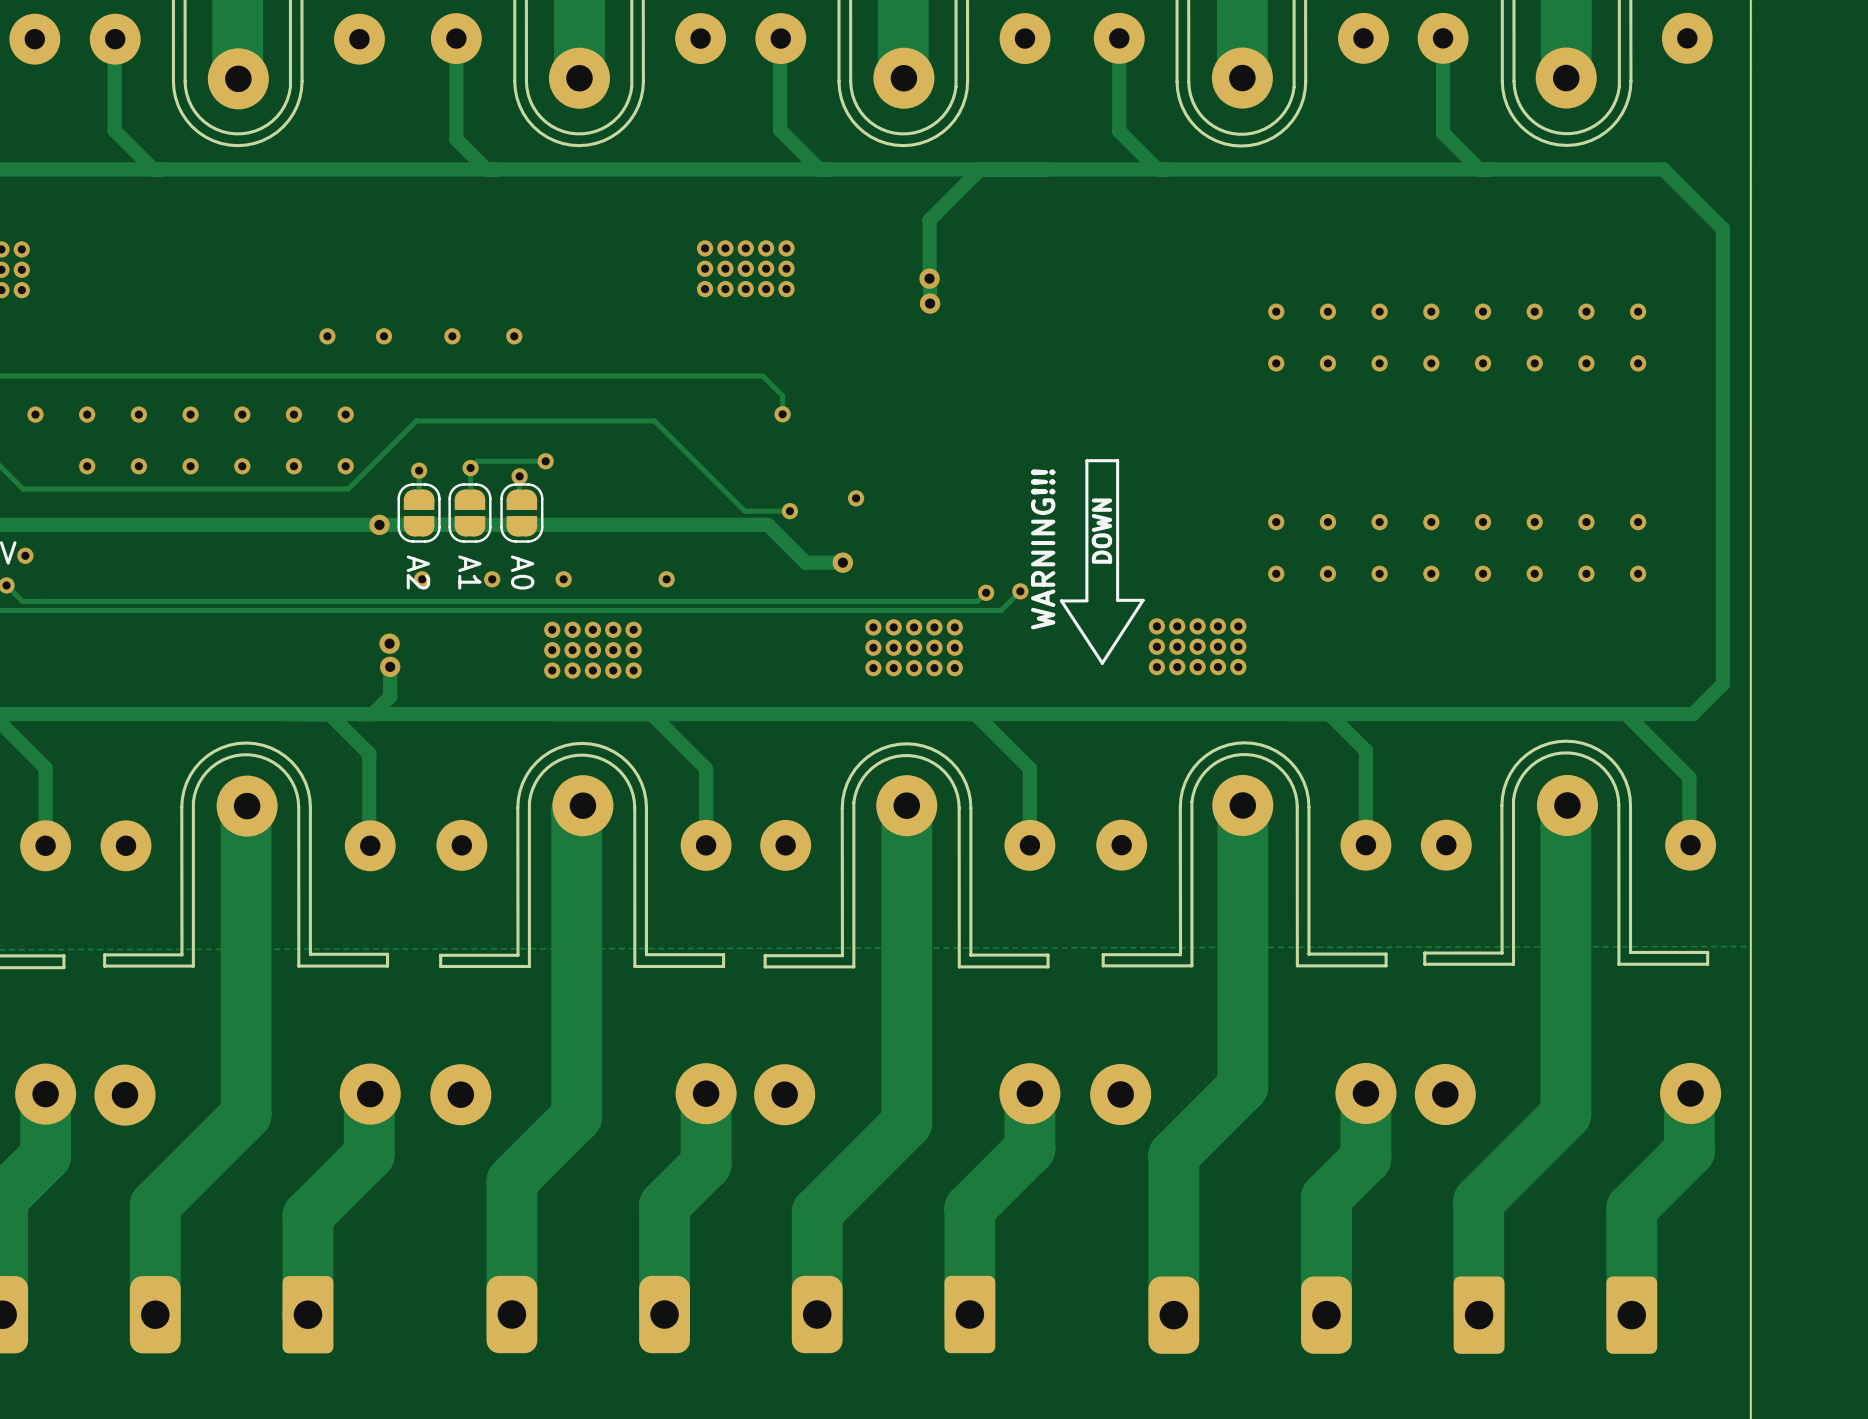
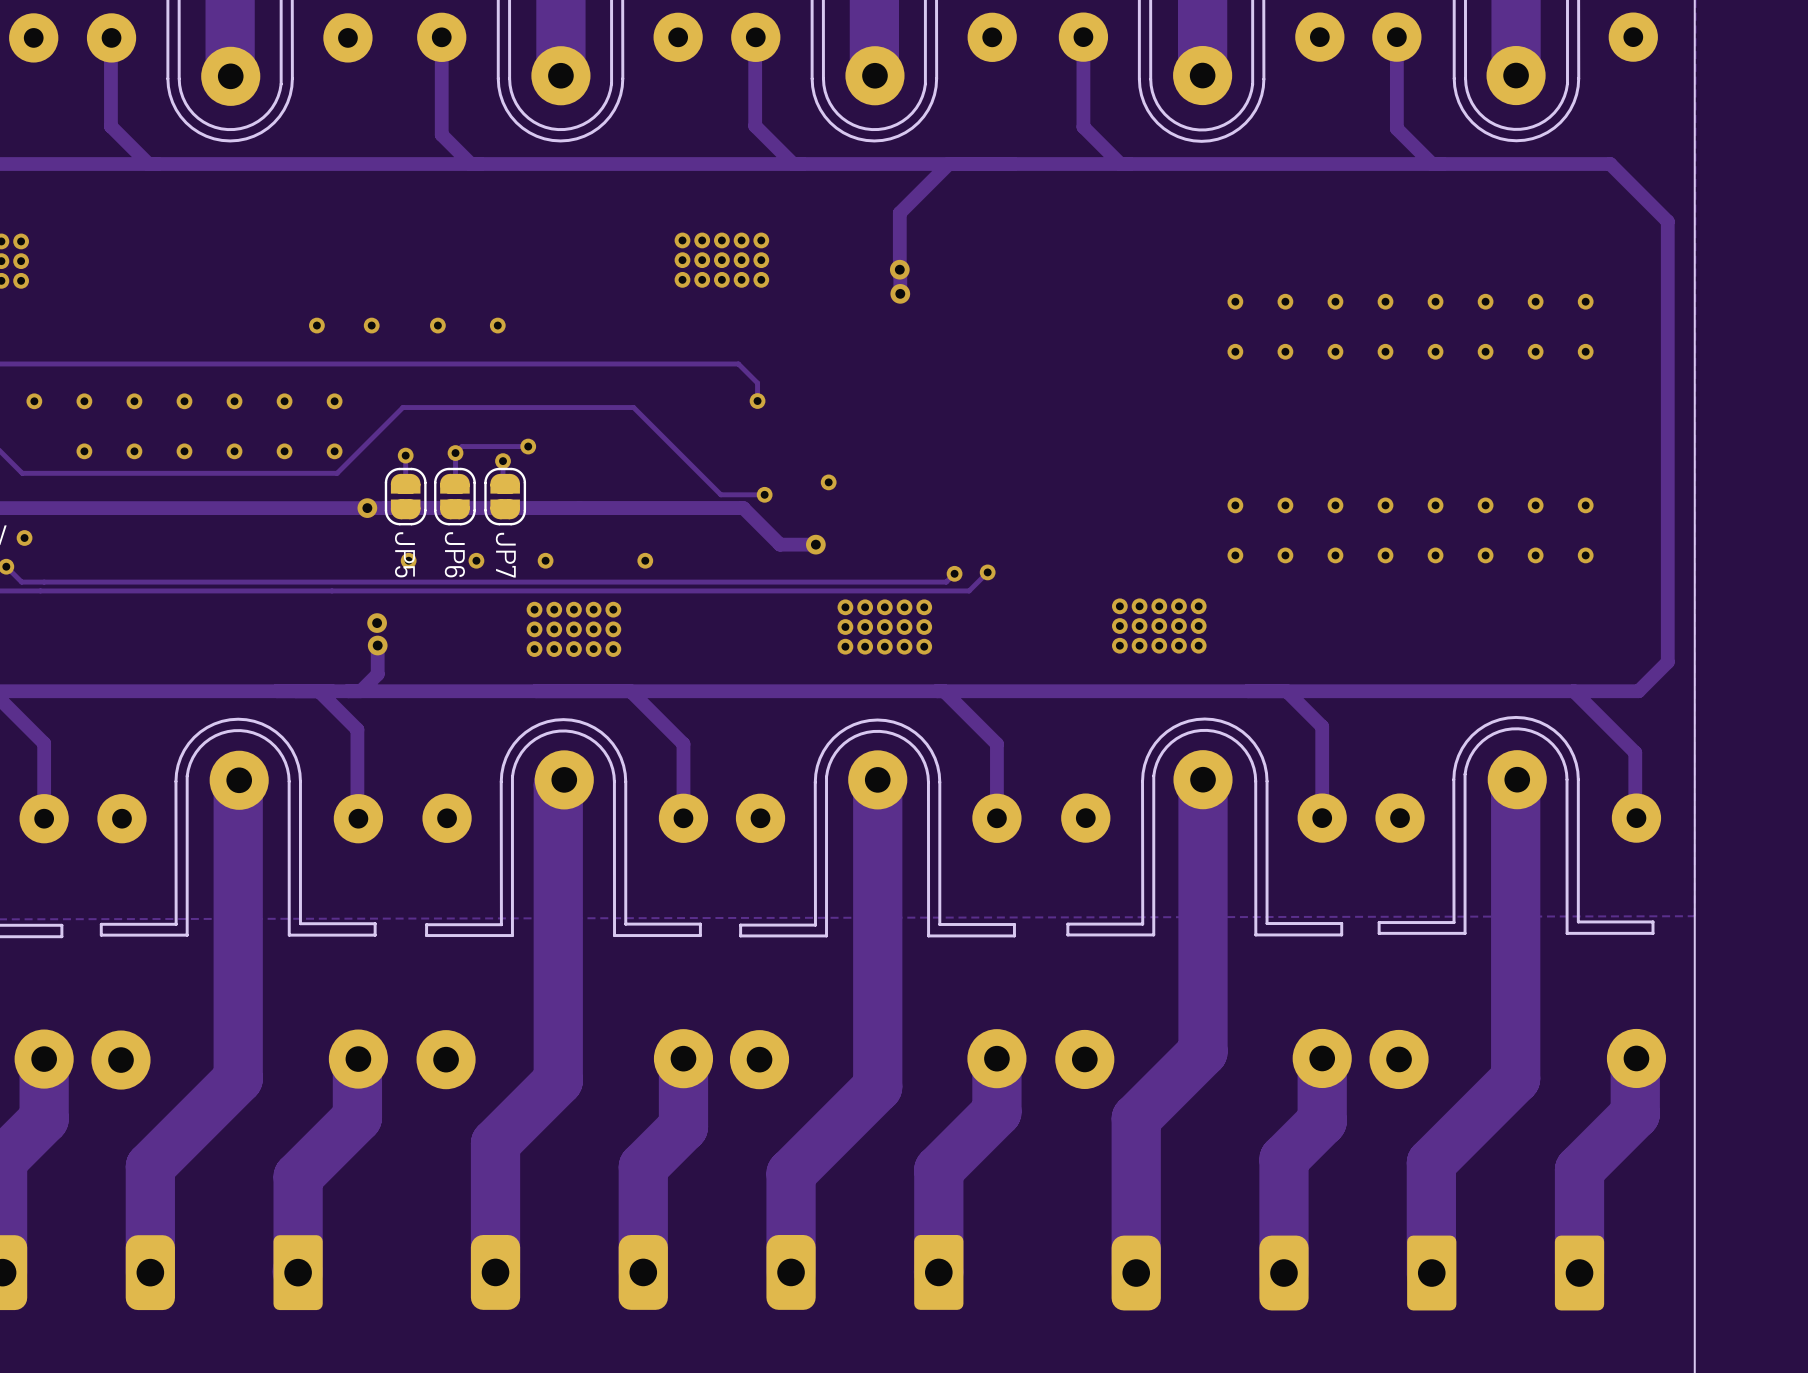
line: (1086, 460) (1117, 460) (1117, 600) (1143, 600) (1102, 663) (1061, 600) (1086, 600) -> none
line: (1086, 460) (1086, 600) -> none
text: DOWN (1101, 531) -> none
text: WARNING!!! (1043, 549) -> none
A2 name: A2 (418, 572) -> JP5 (404, 554)
A1 name: A1 (469, 572) -> JP6 (454, 554)
A0 name: A0 (522, 572) -> JP7 (505, 555)

